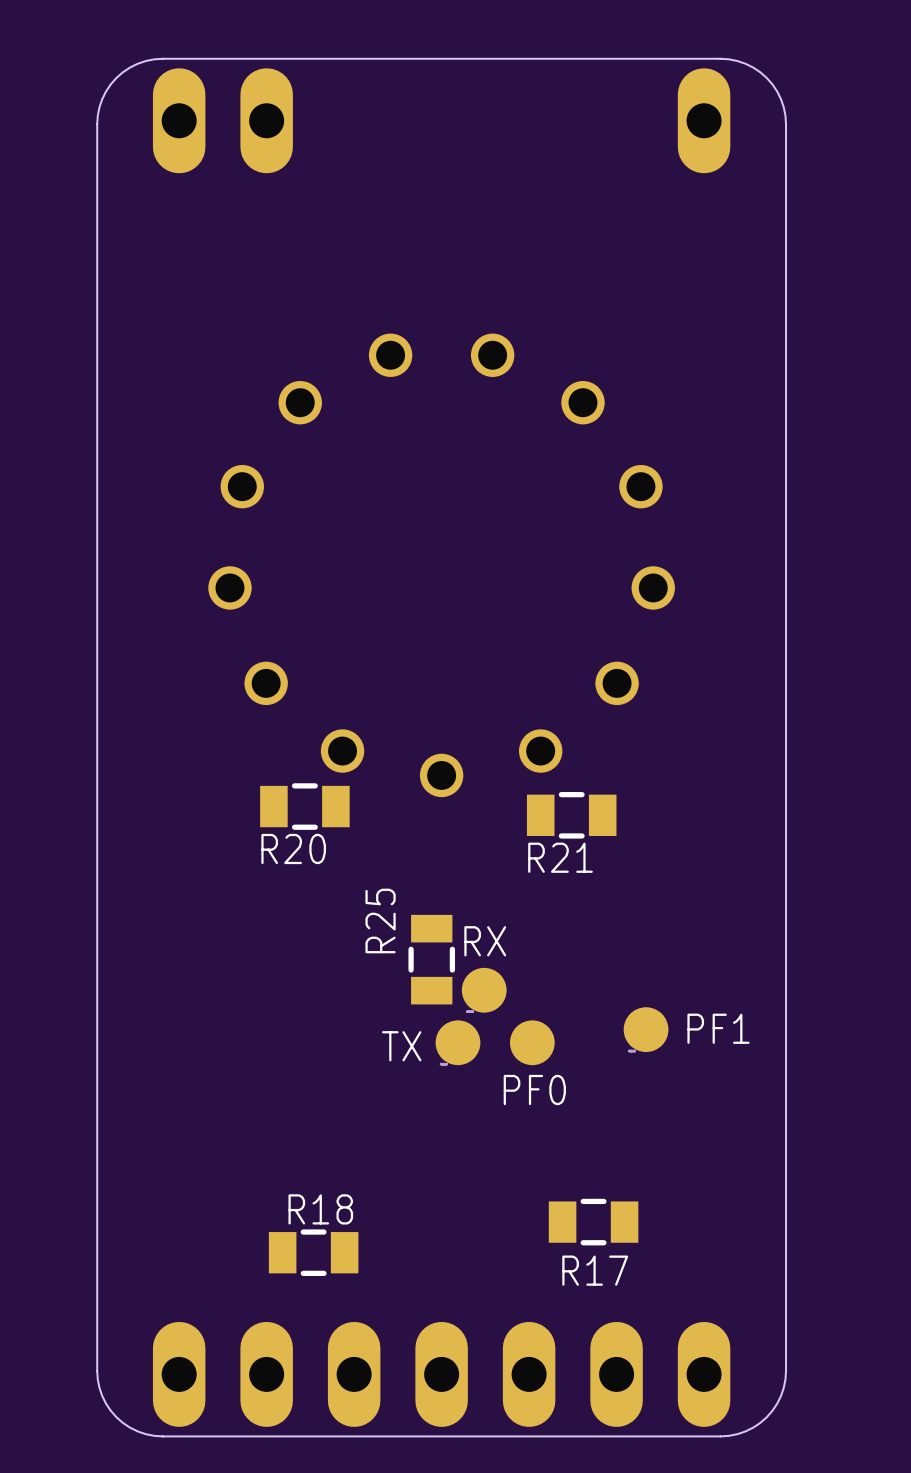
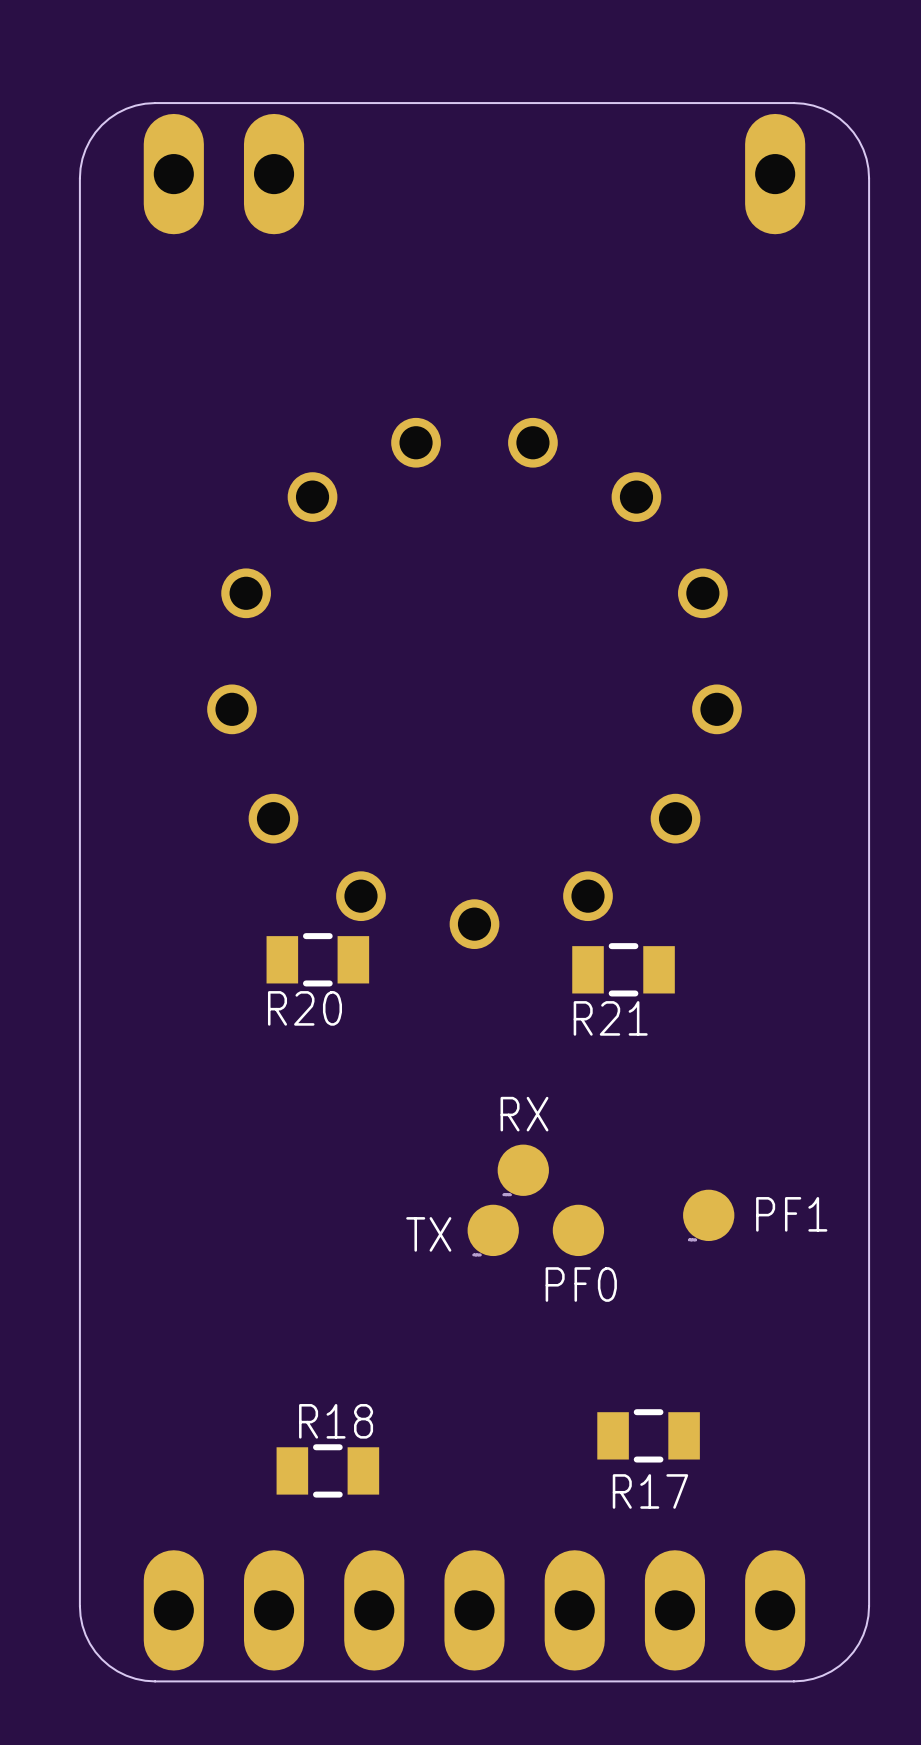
R25: (431, 959) -> none

